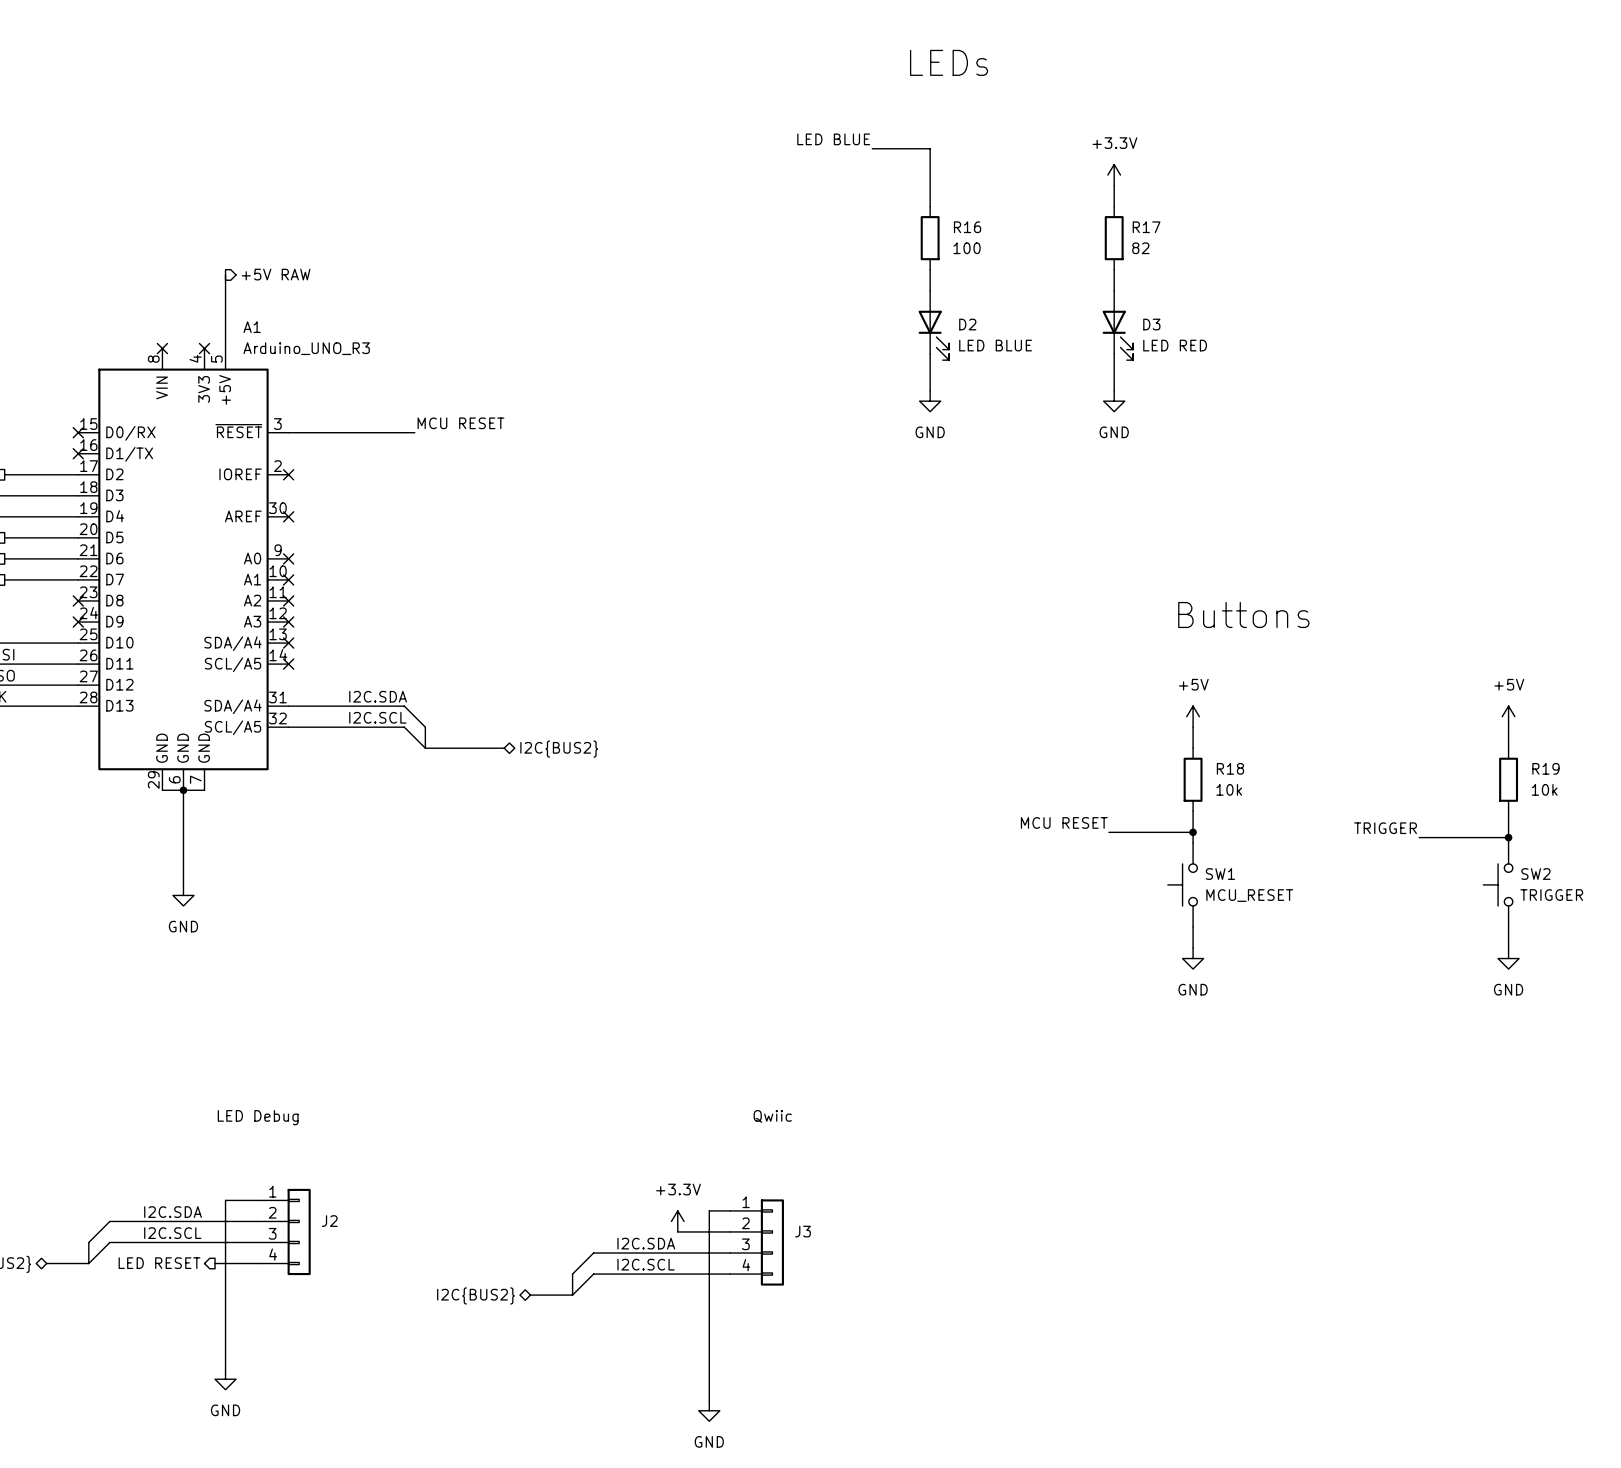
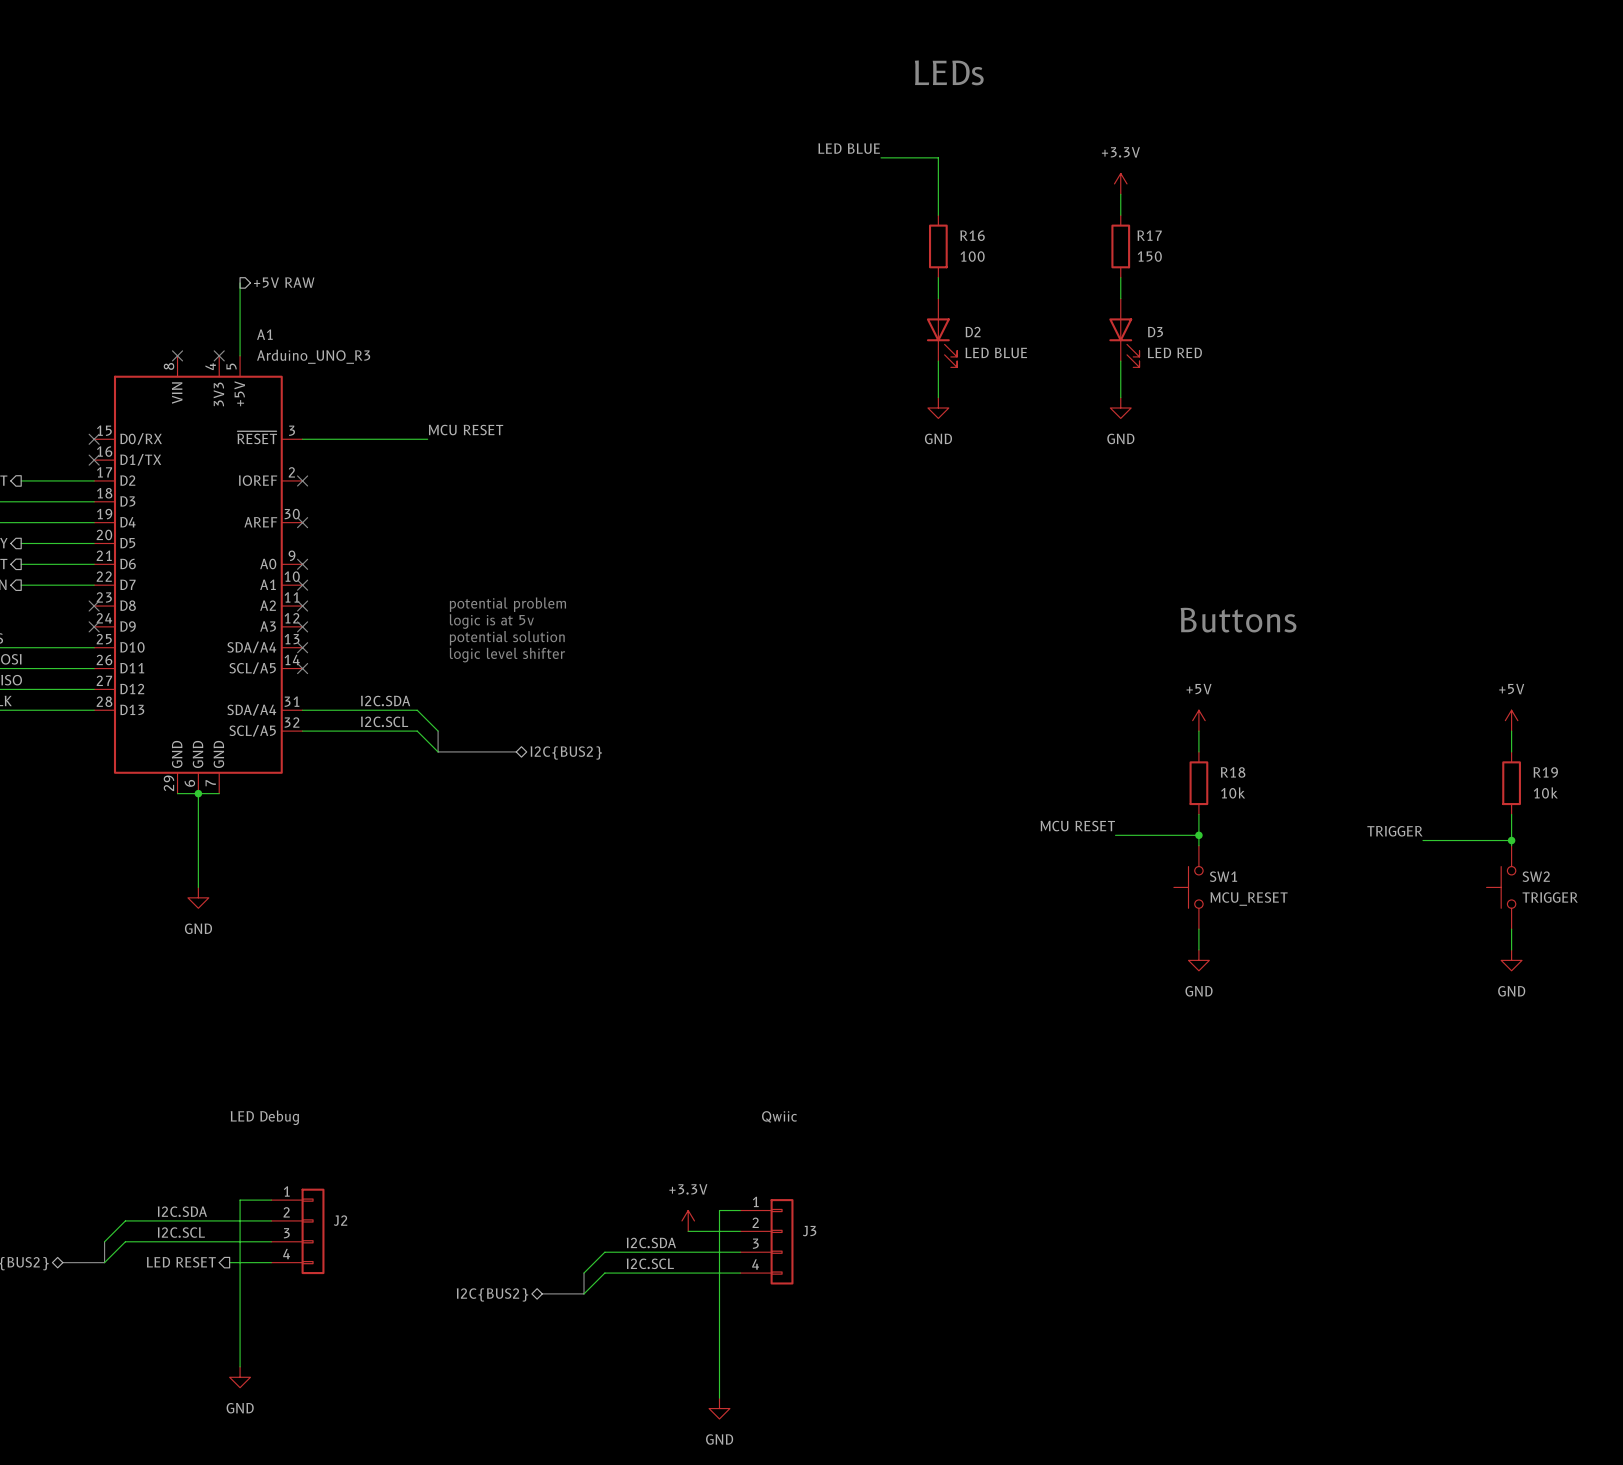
R17 value: 82 (1140, 248) -> 150 (1149, 256)
text: none -> potential problem (507, 604)
text: none -> logic is at 5v (491, 621)
text: none -> potential solution (507, 638)
text: none -> logic level shifter (507, 655)

